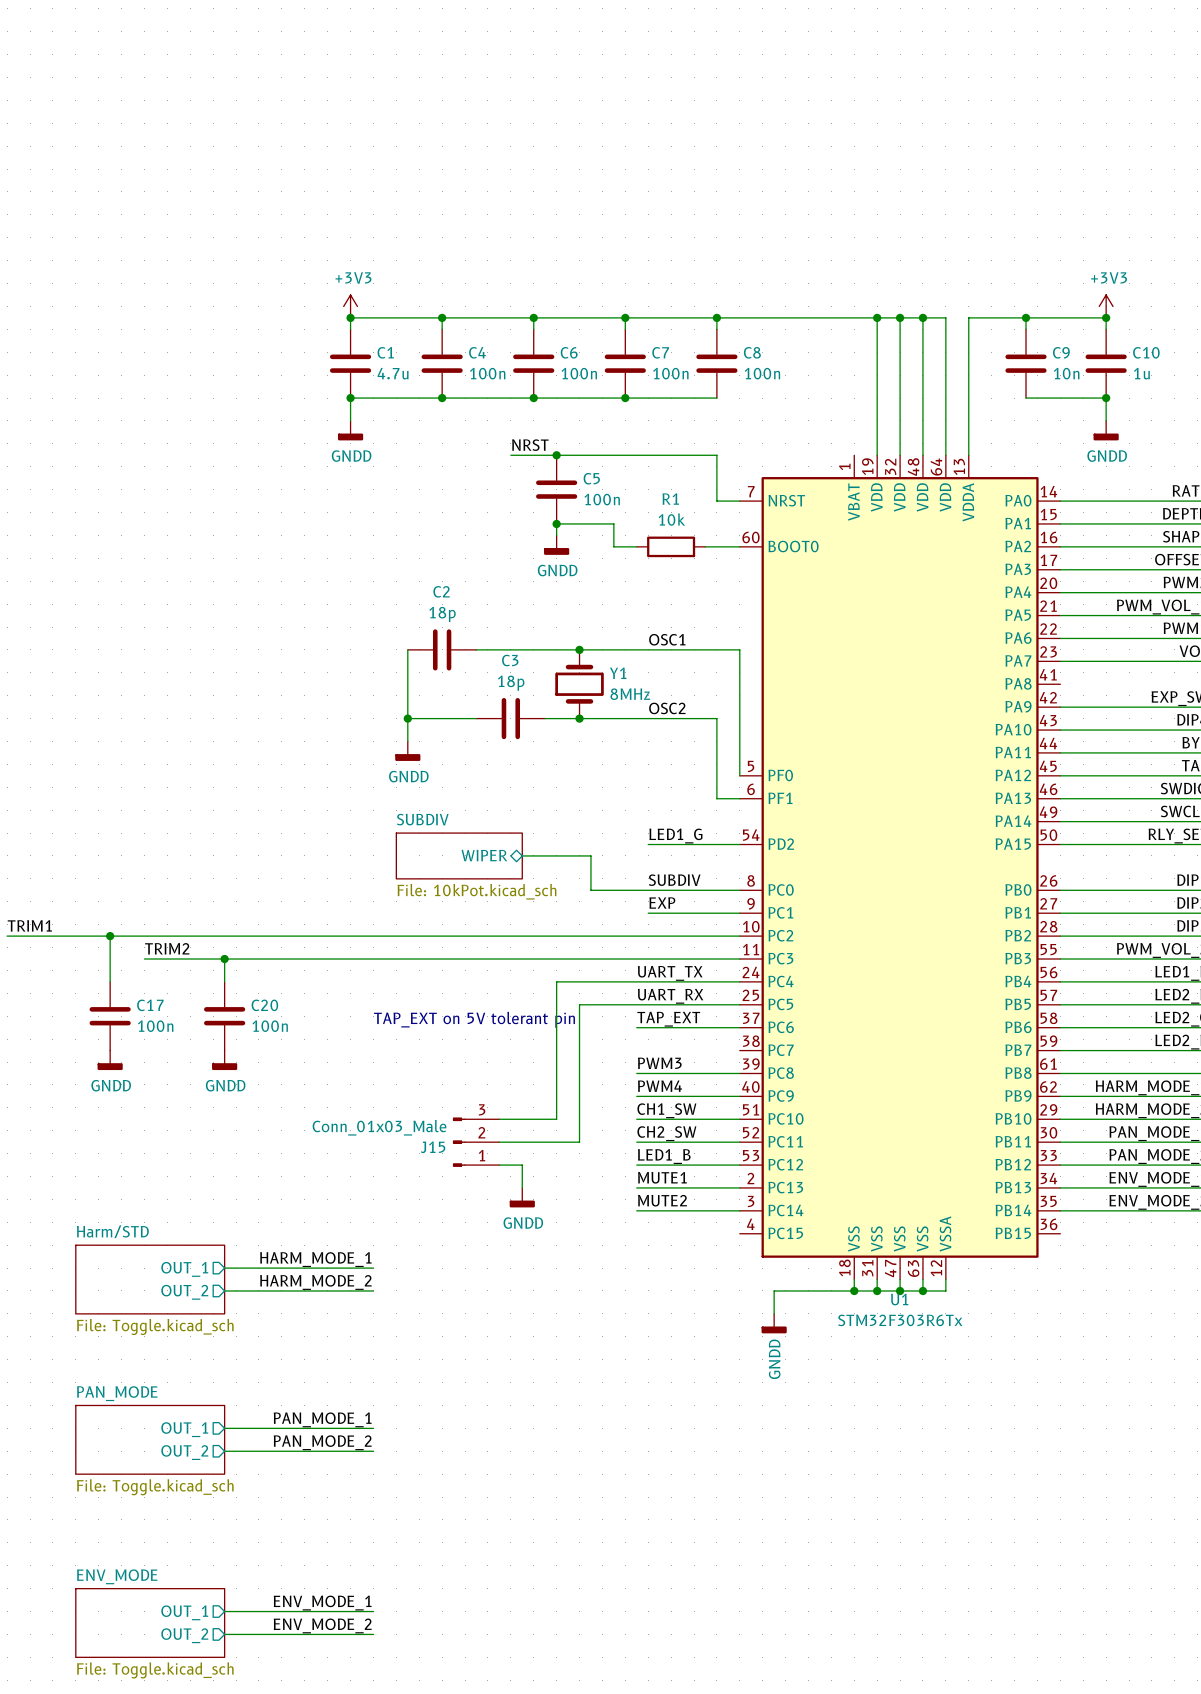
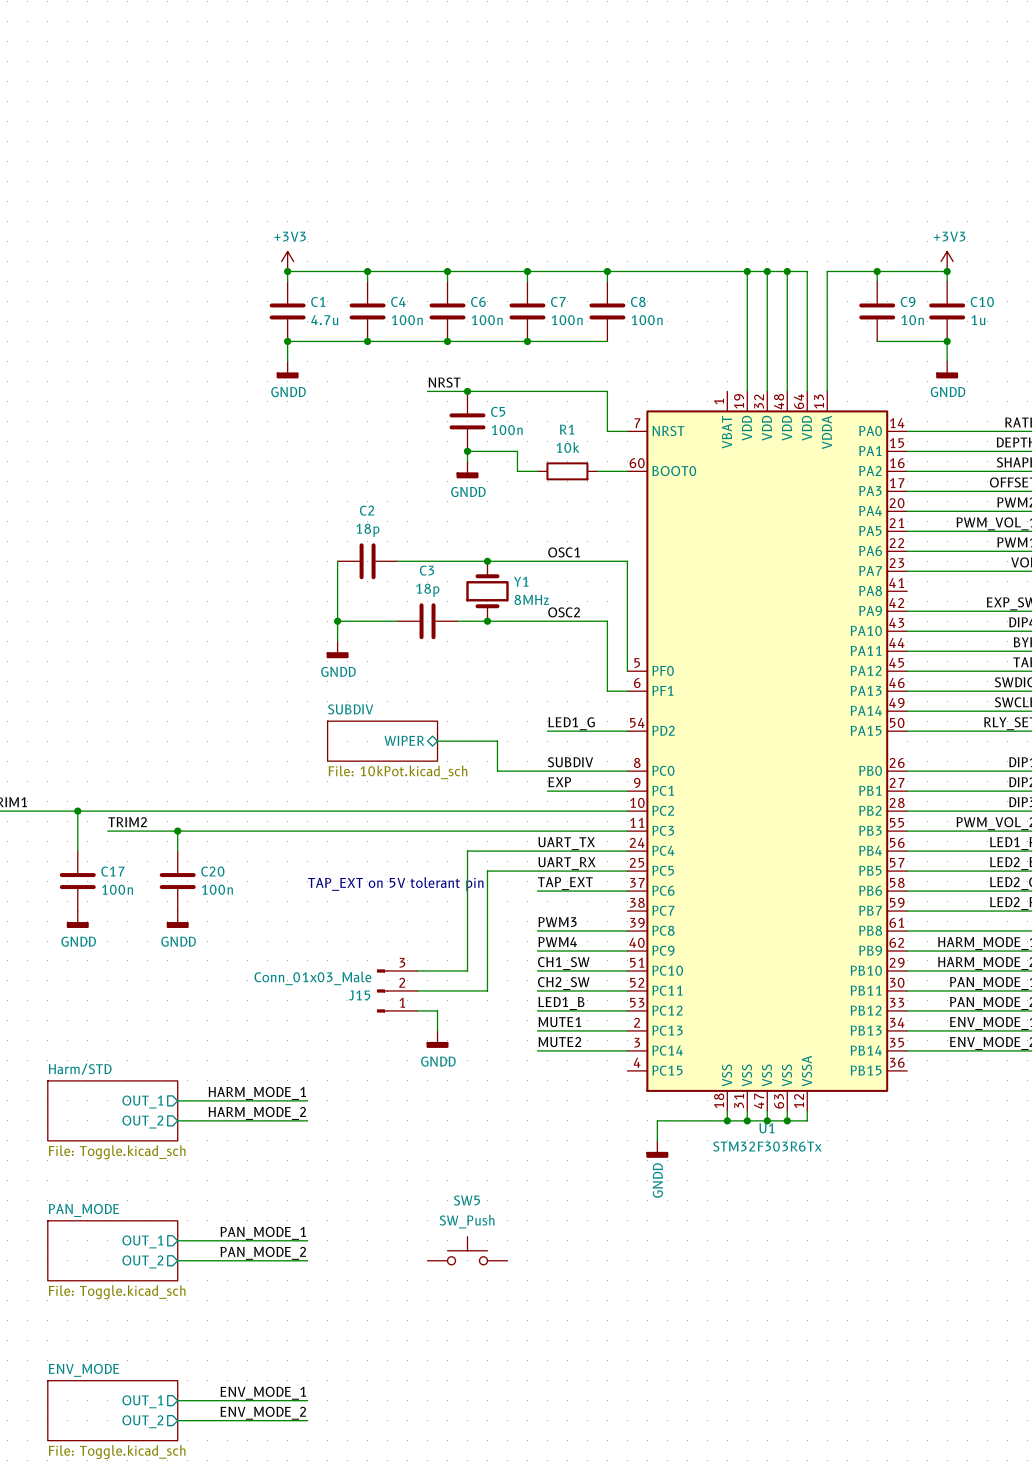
SW5: none -> SW_Push (467, 1250)

